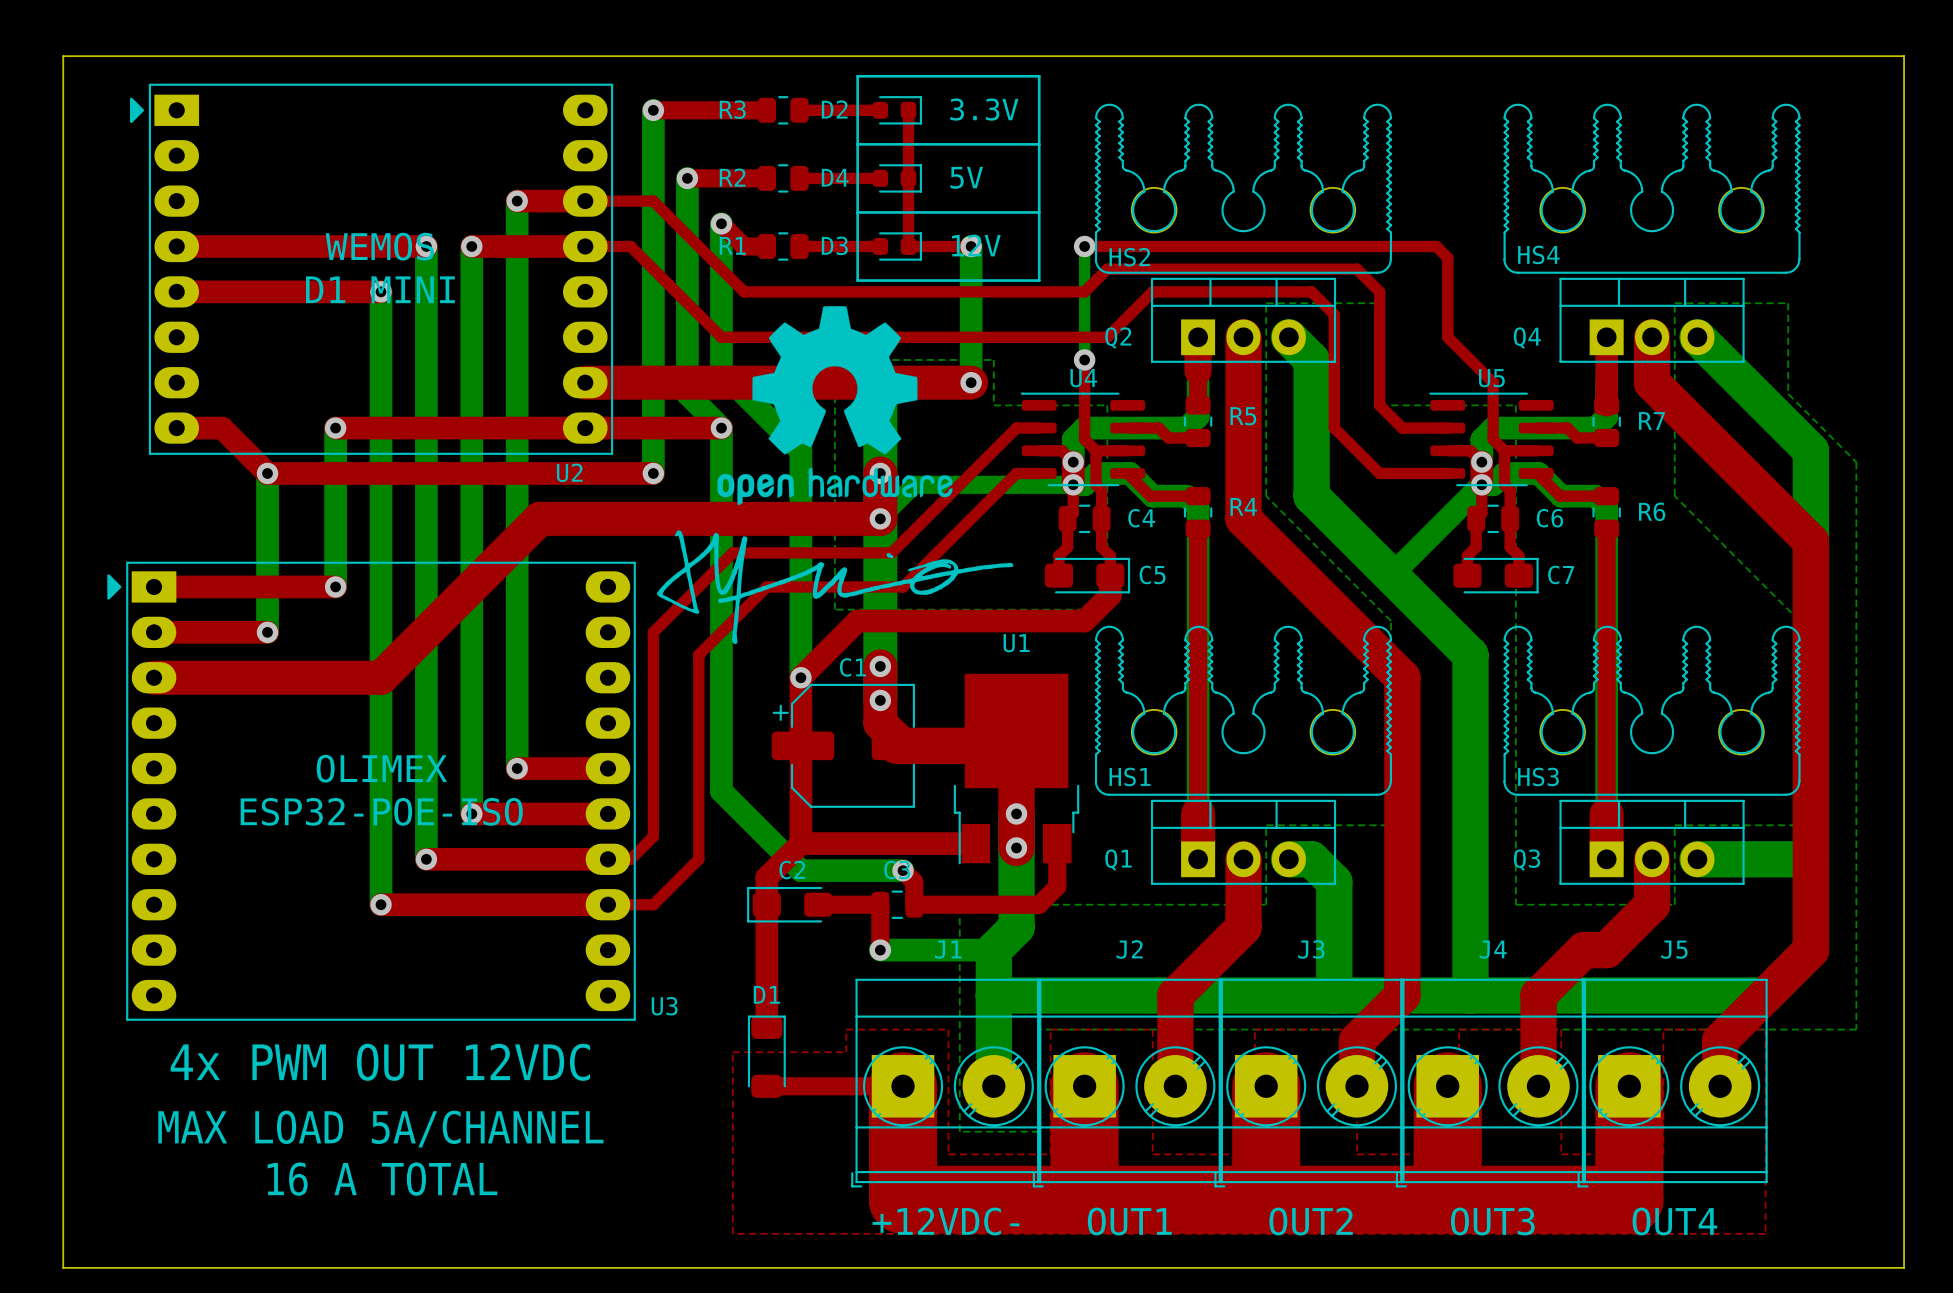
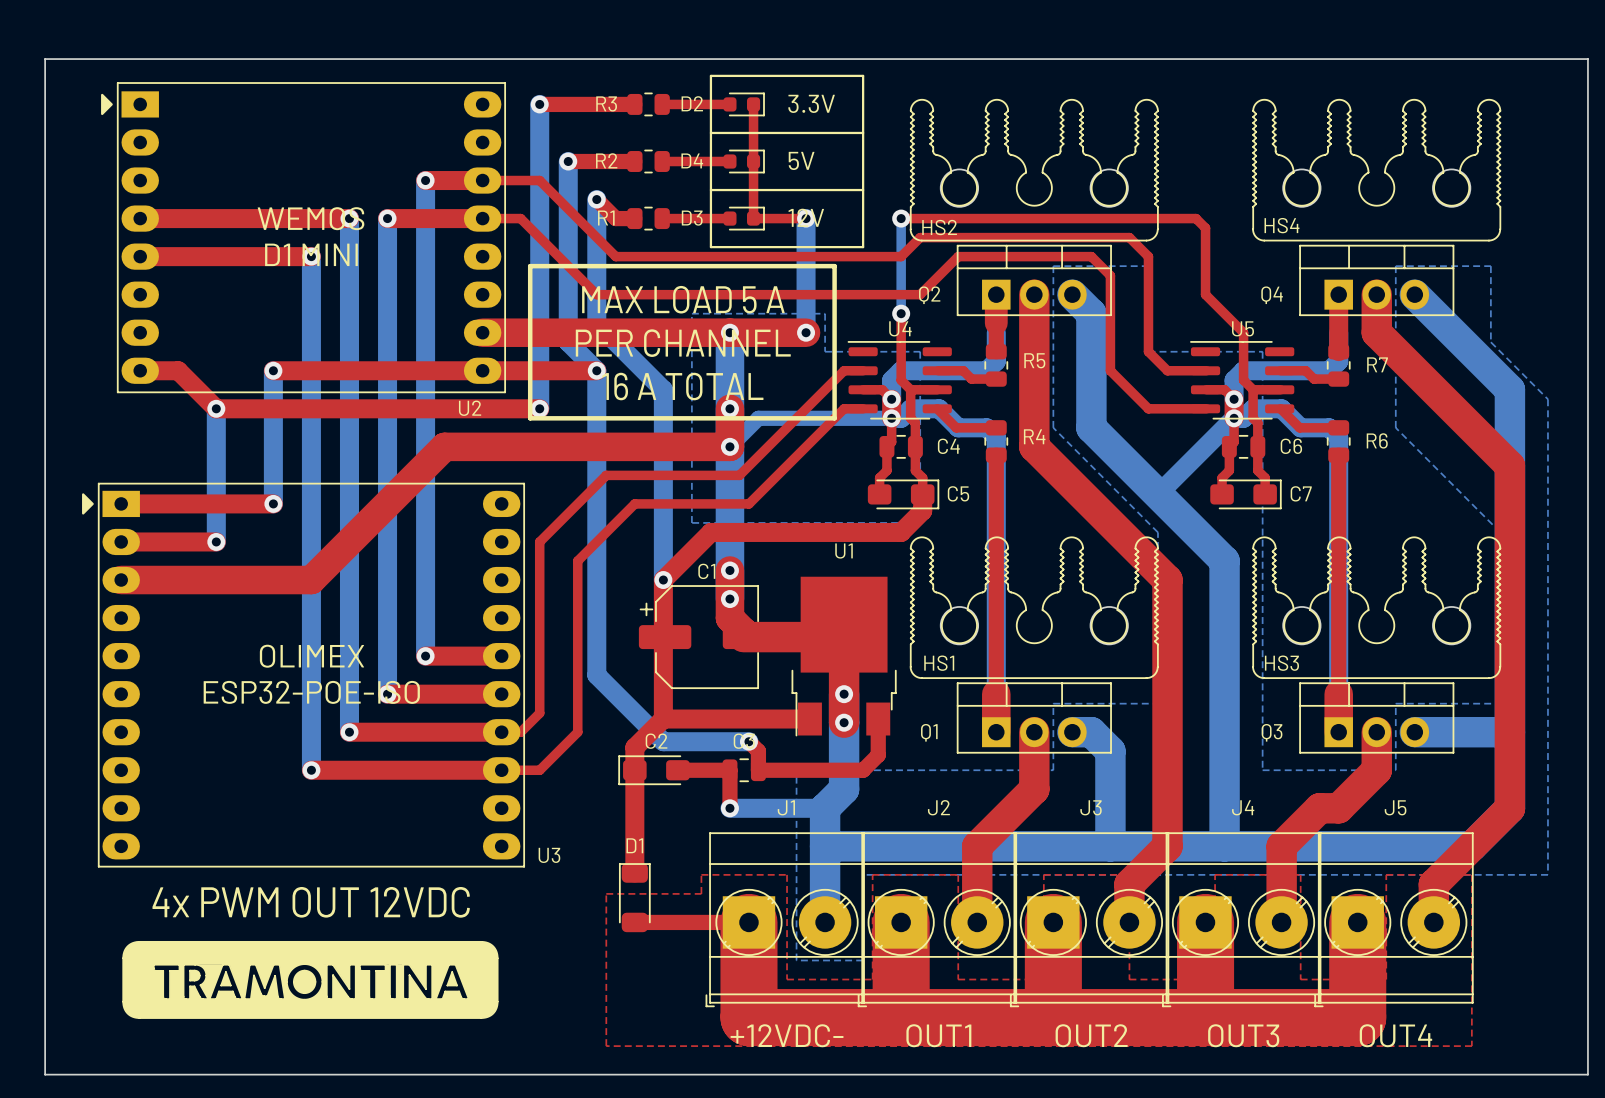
line: none -> (530, 266) (530, 418) (834, 418) (834, 266) (530, 266)
drawing: [717, 306, 953, 506] -> none
text: none -> MAX LOAD 5 A (683, 299)
text: none -> PER CHANNEL (683, 343)
text: none -> 16 A TOTAL (682, 386)
drawing: [657, 530, 1014, 645] -> none
drawing: none -> [122, 941, 499, 1019]
text: MAX LOAD 5A/CHANNEL (380, 1129) -> none
text: 16 A TOTAL (382, 1179) -> none

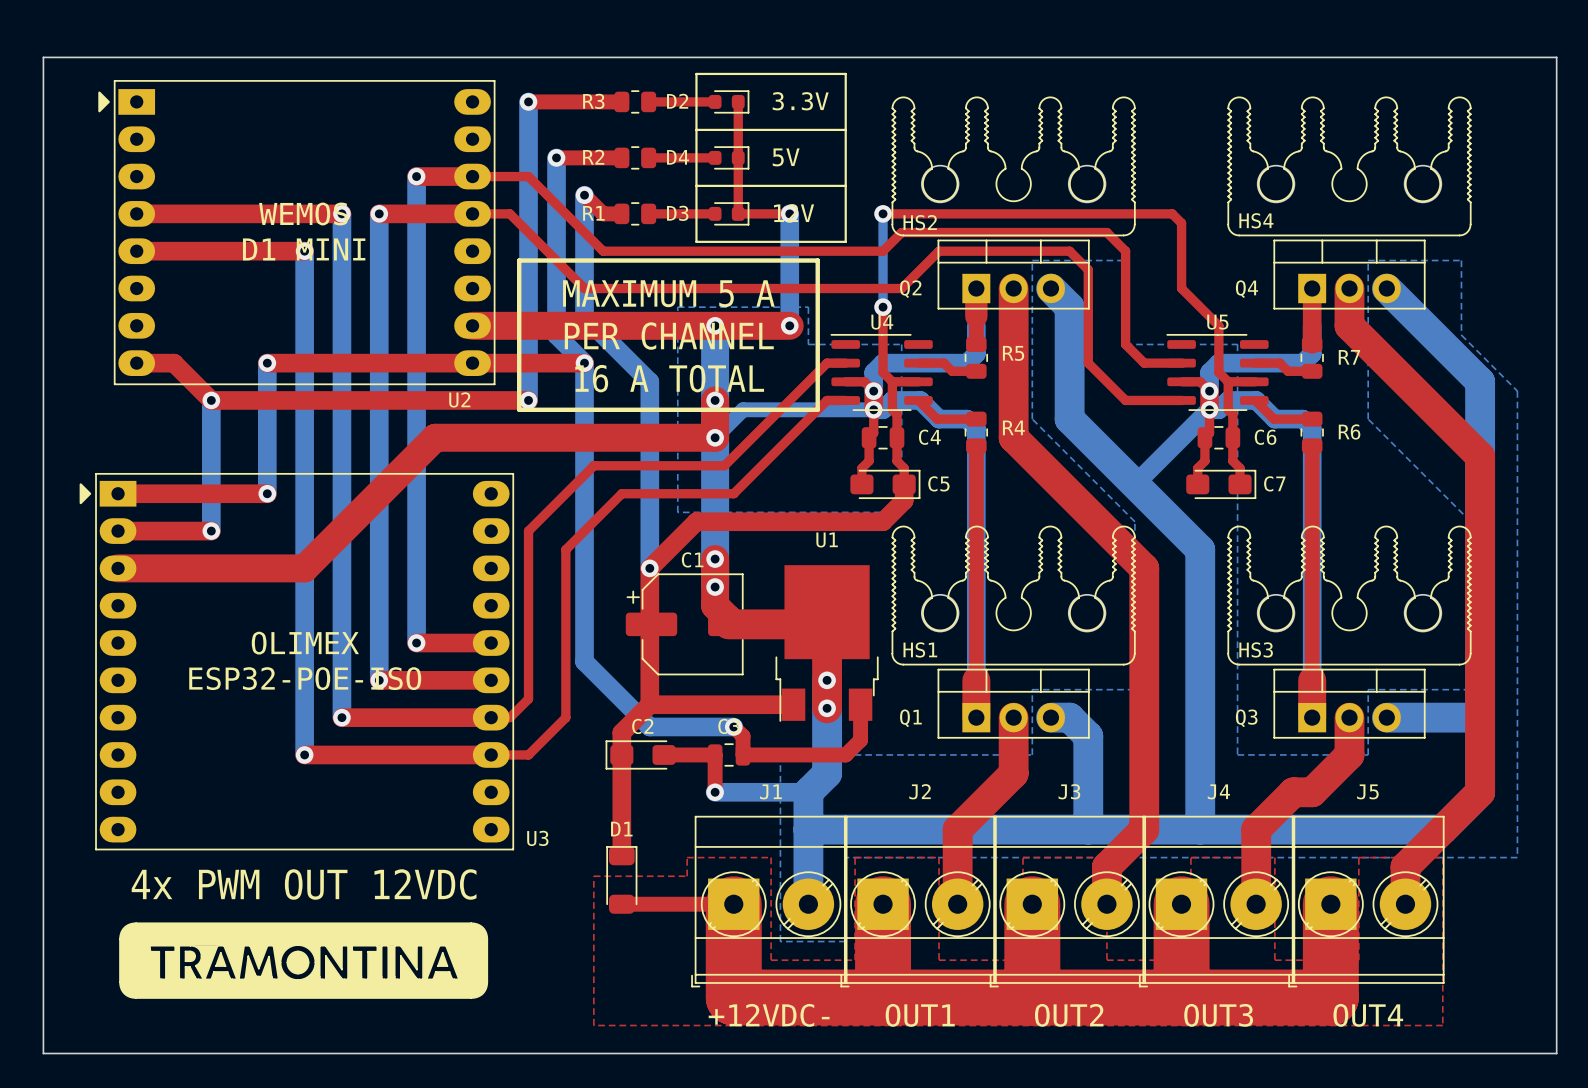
text: MAX LOAD 5 A (683, 299) -> MAXIMUM 5 A (668, 293)

